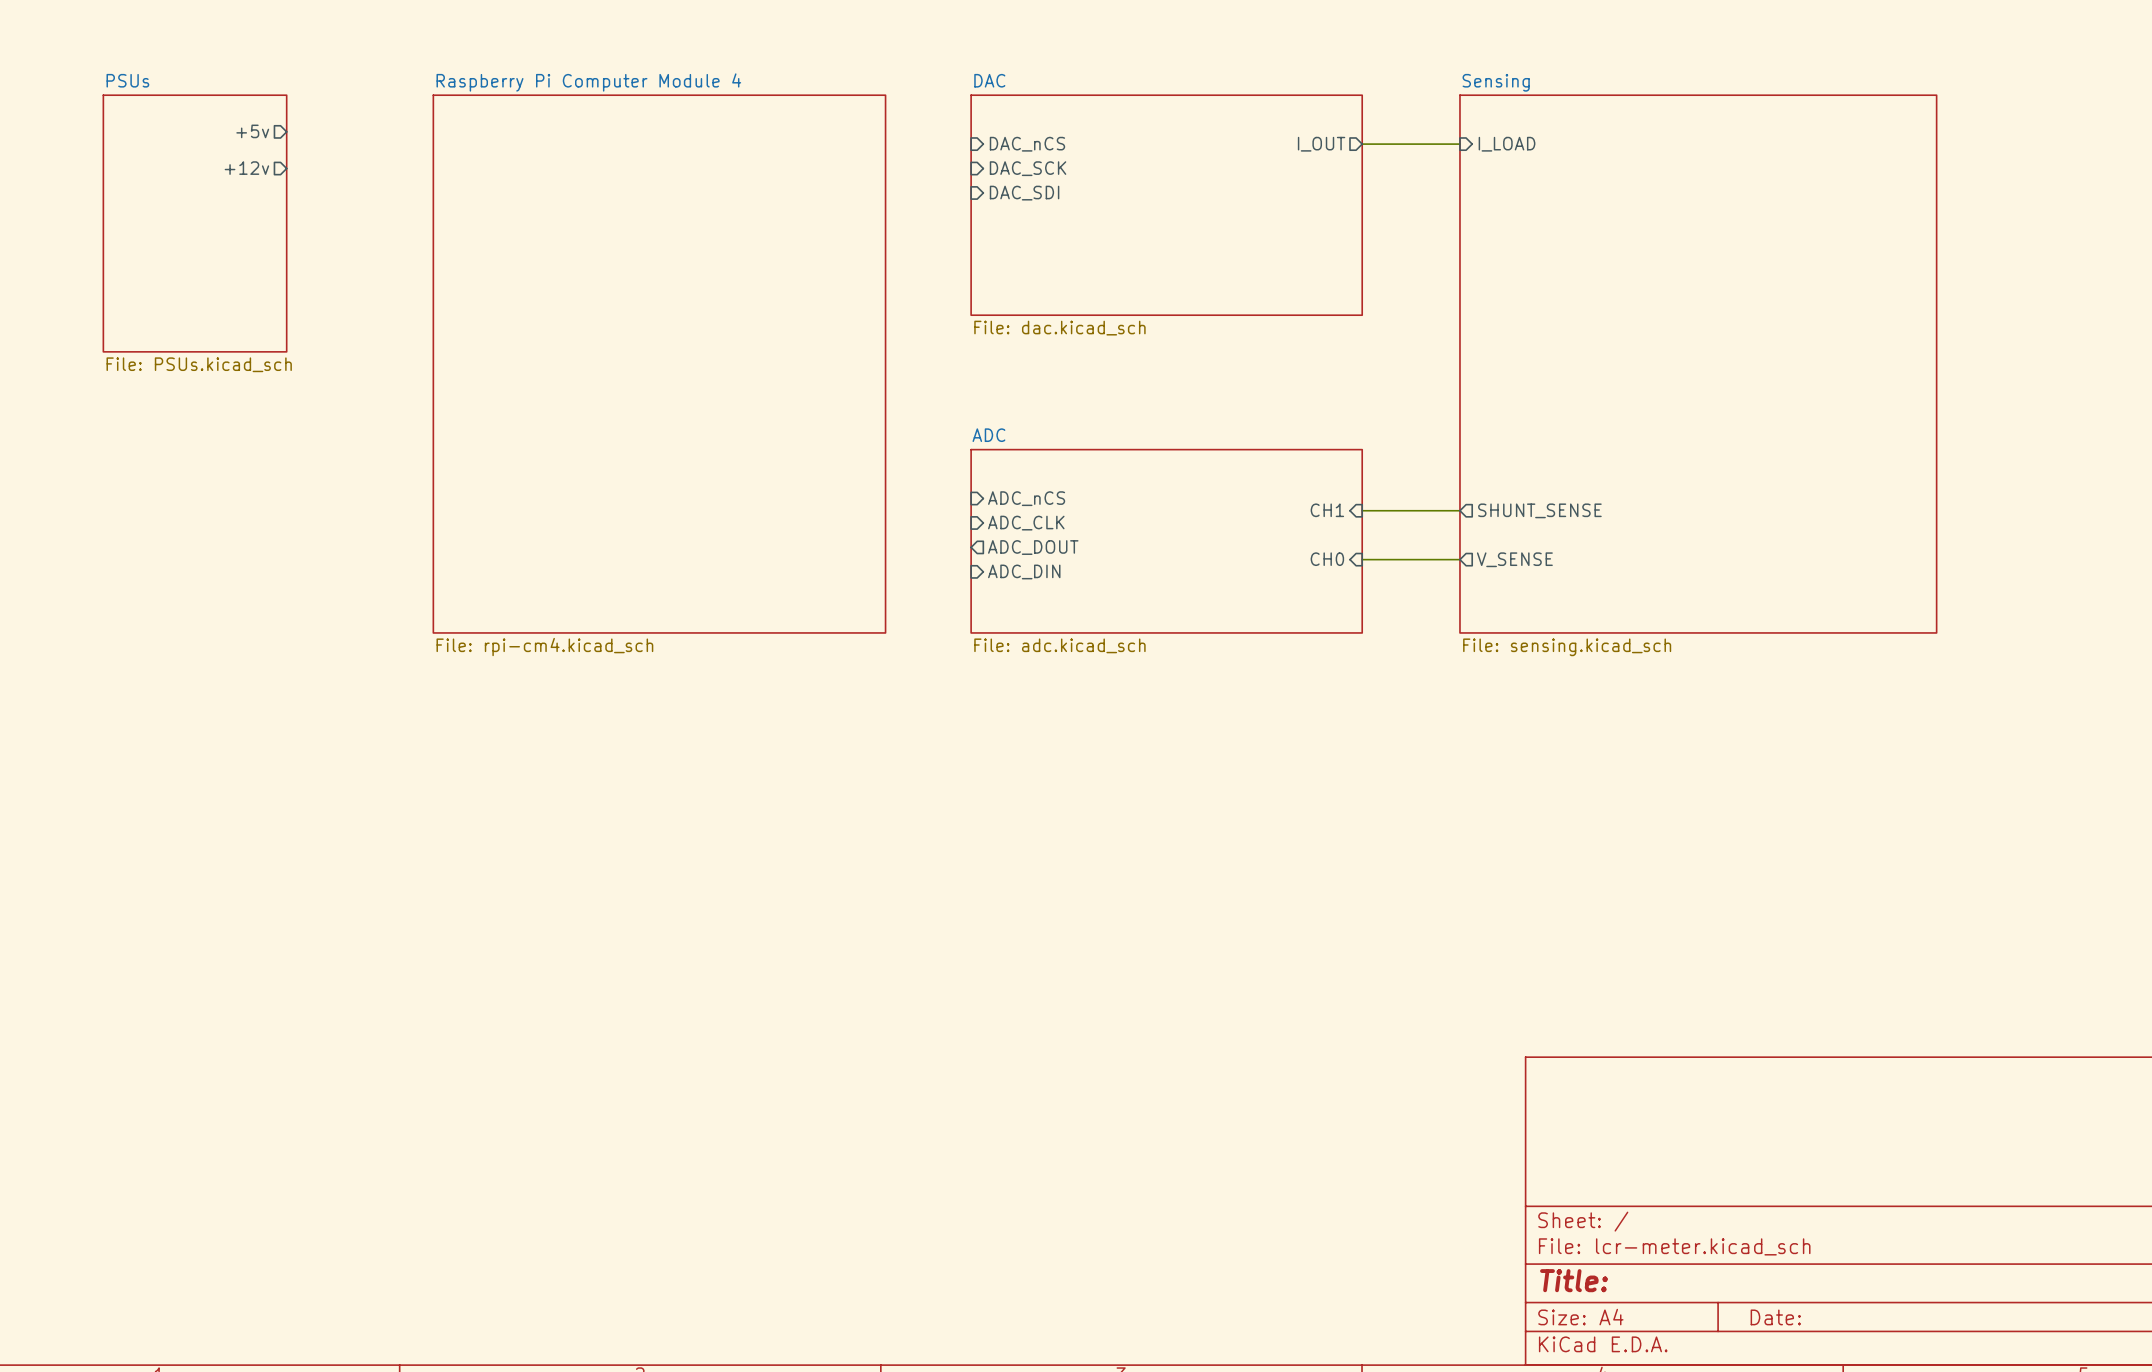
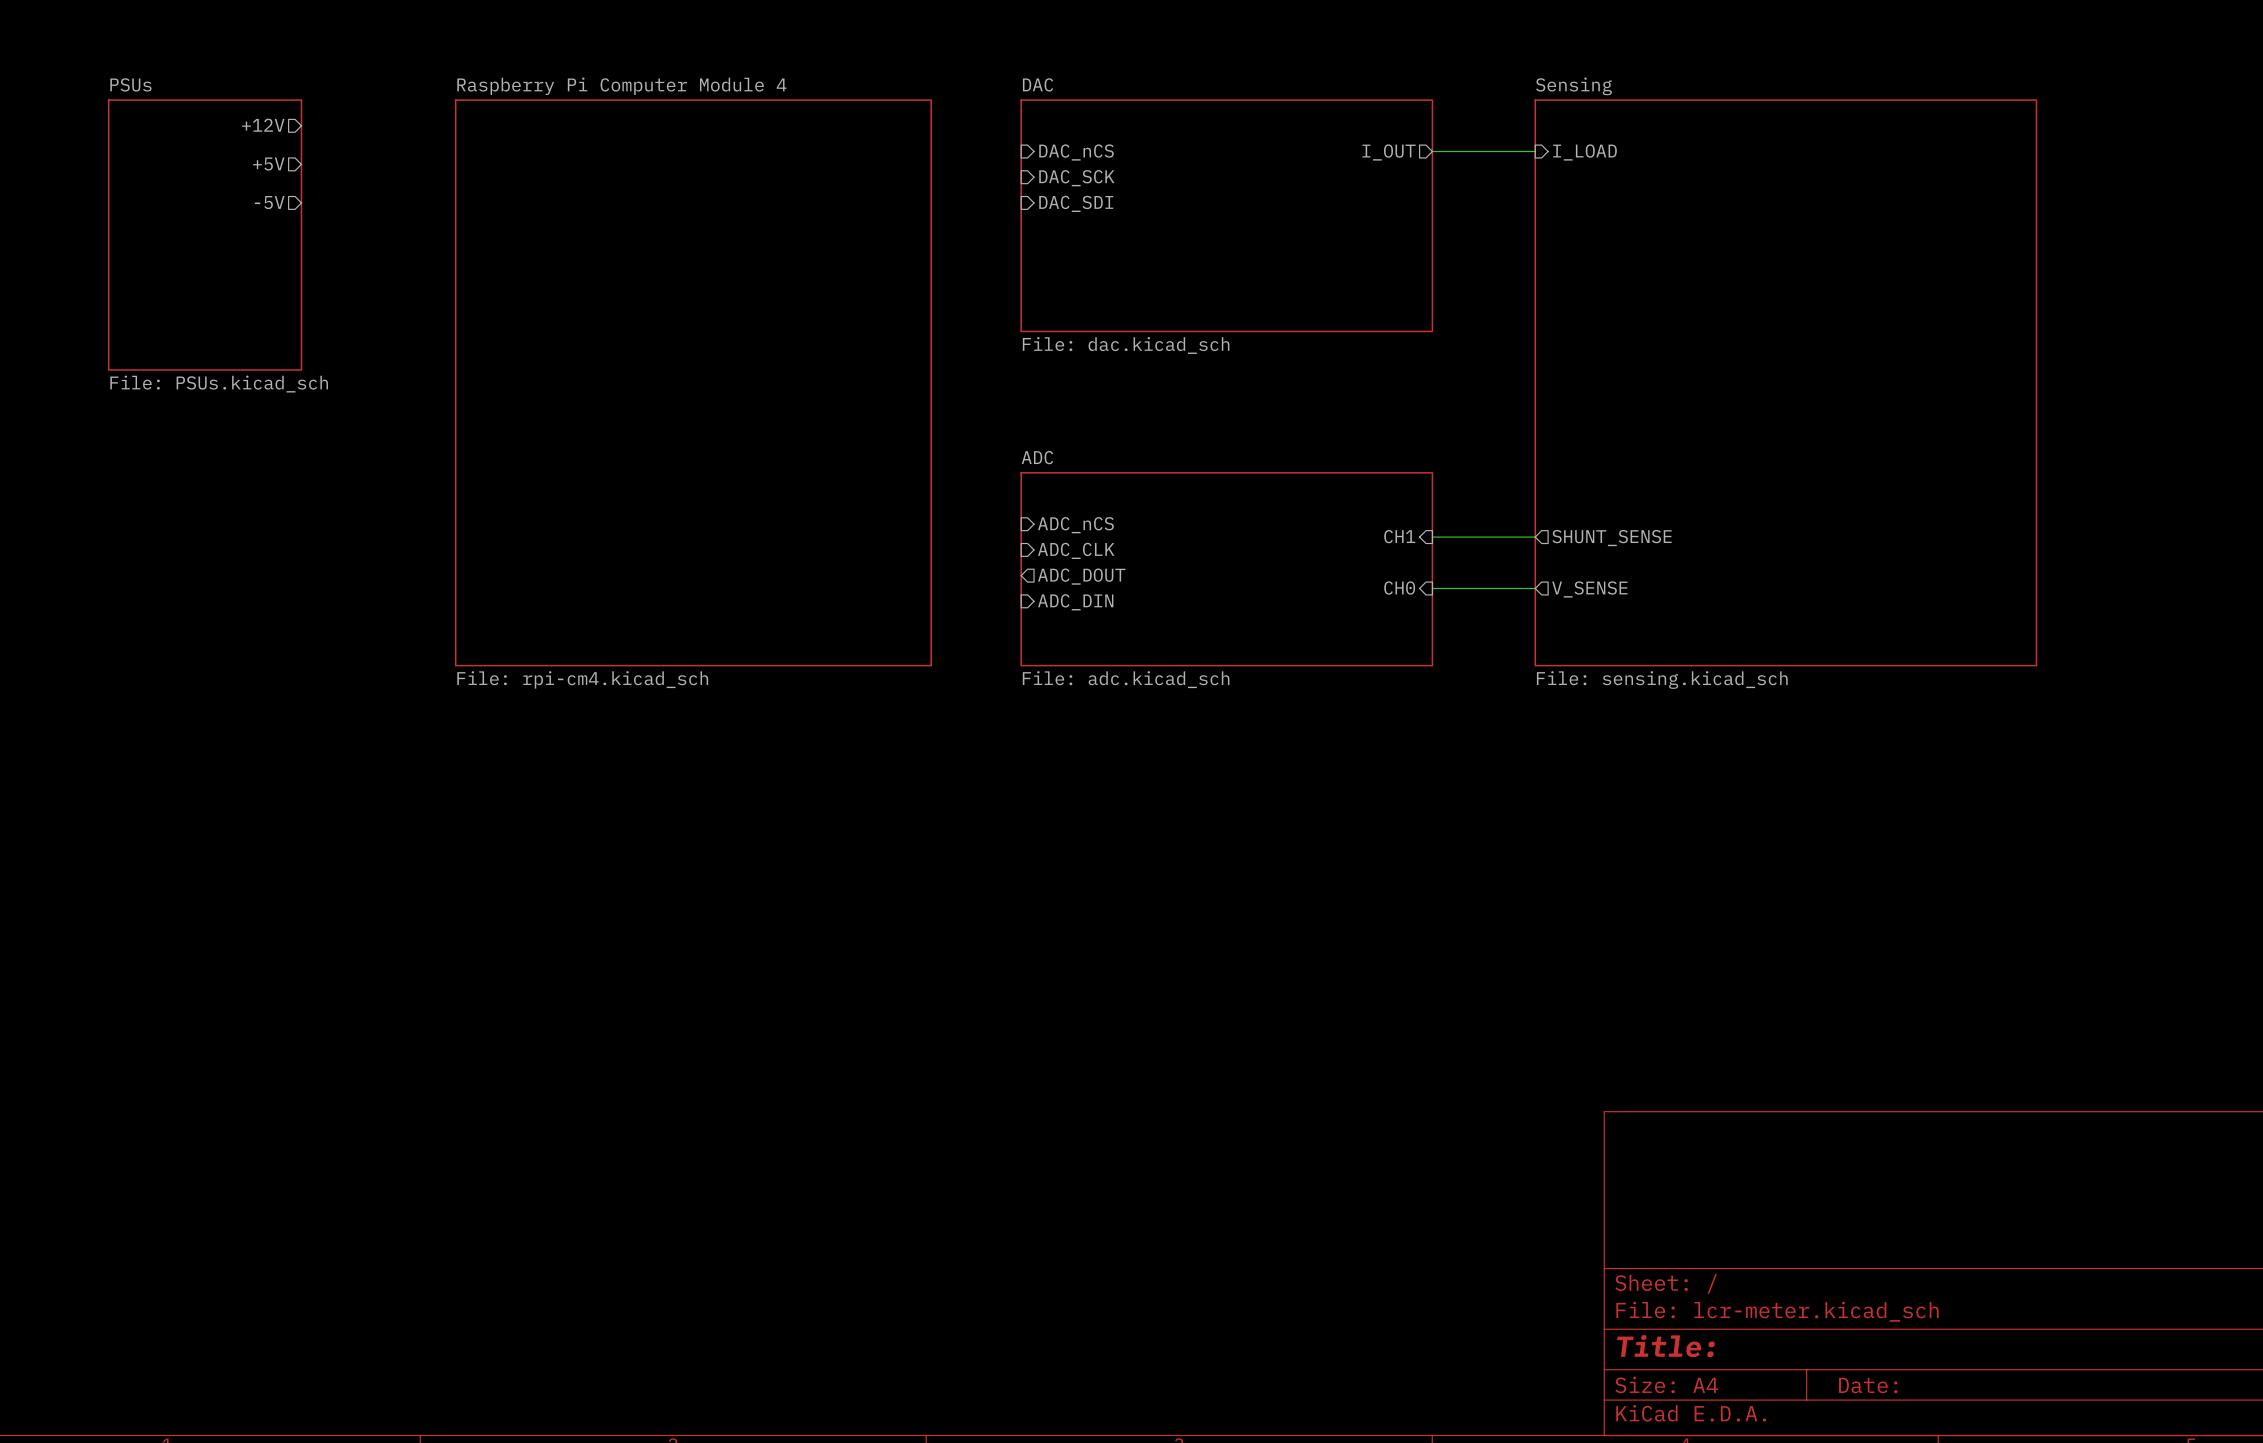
sheet pin: none -> +12V (263, 125)
sheet pin: +5v (252, 131) -> +5V (268, 164)
sheet pin: +12v (246, 168) -> none
sheet pin: none -> -5V (269, 202)

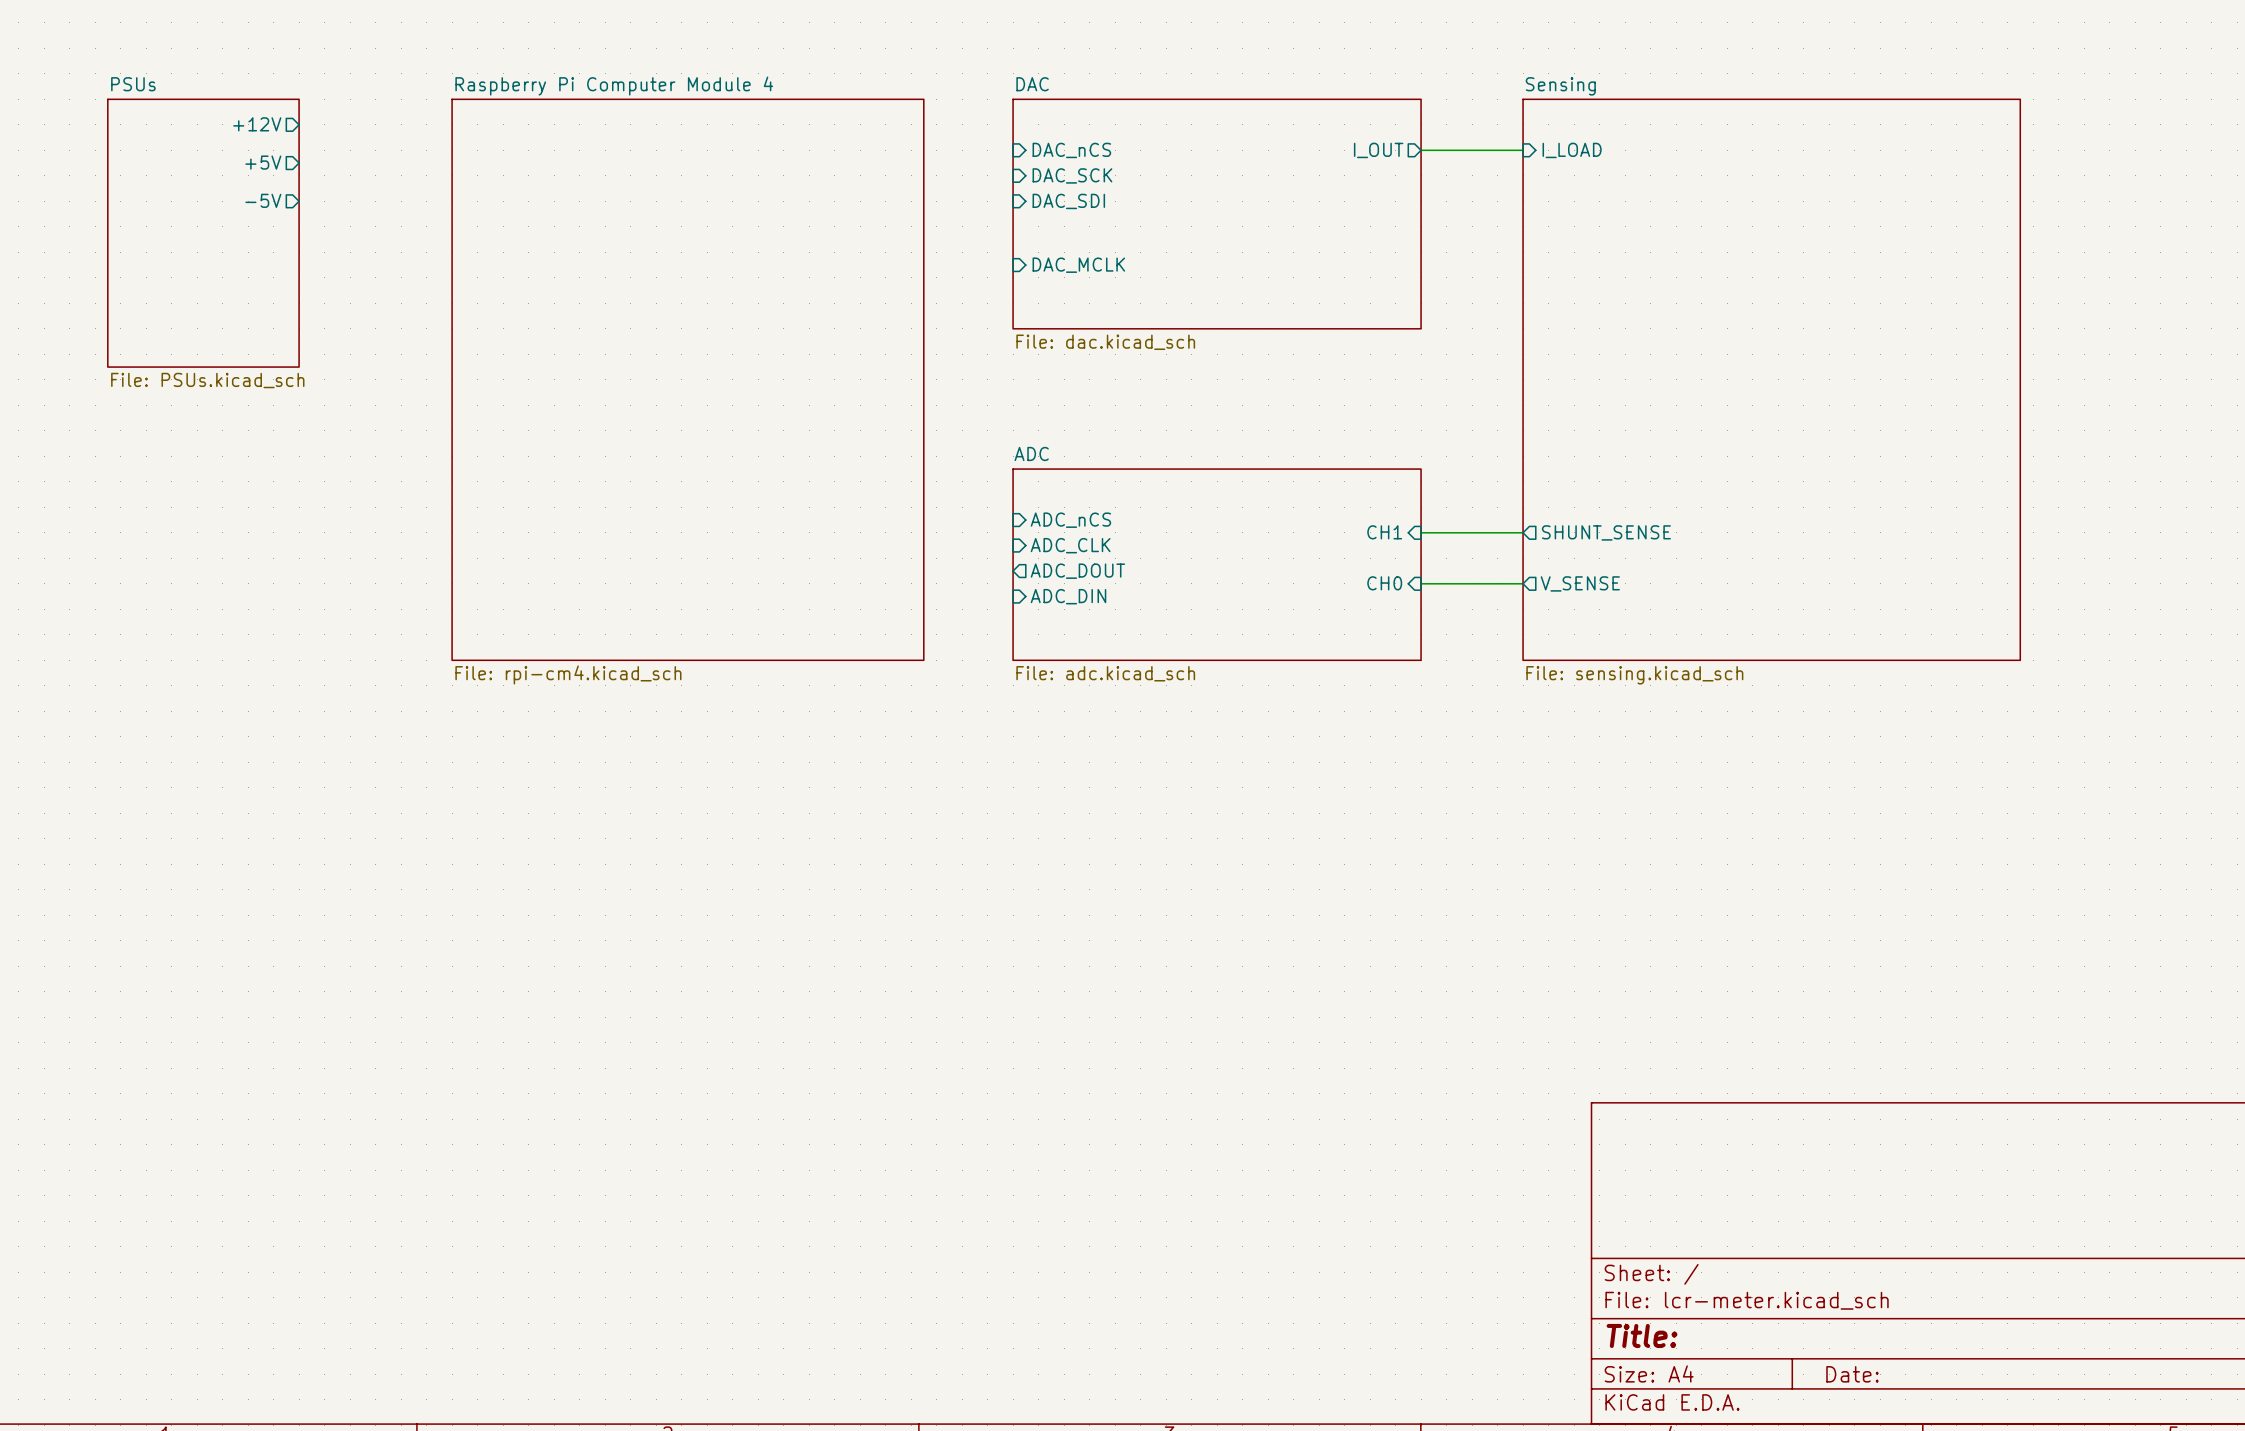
sheet pin: none -> DAC_MCLK (1078, 265)

